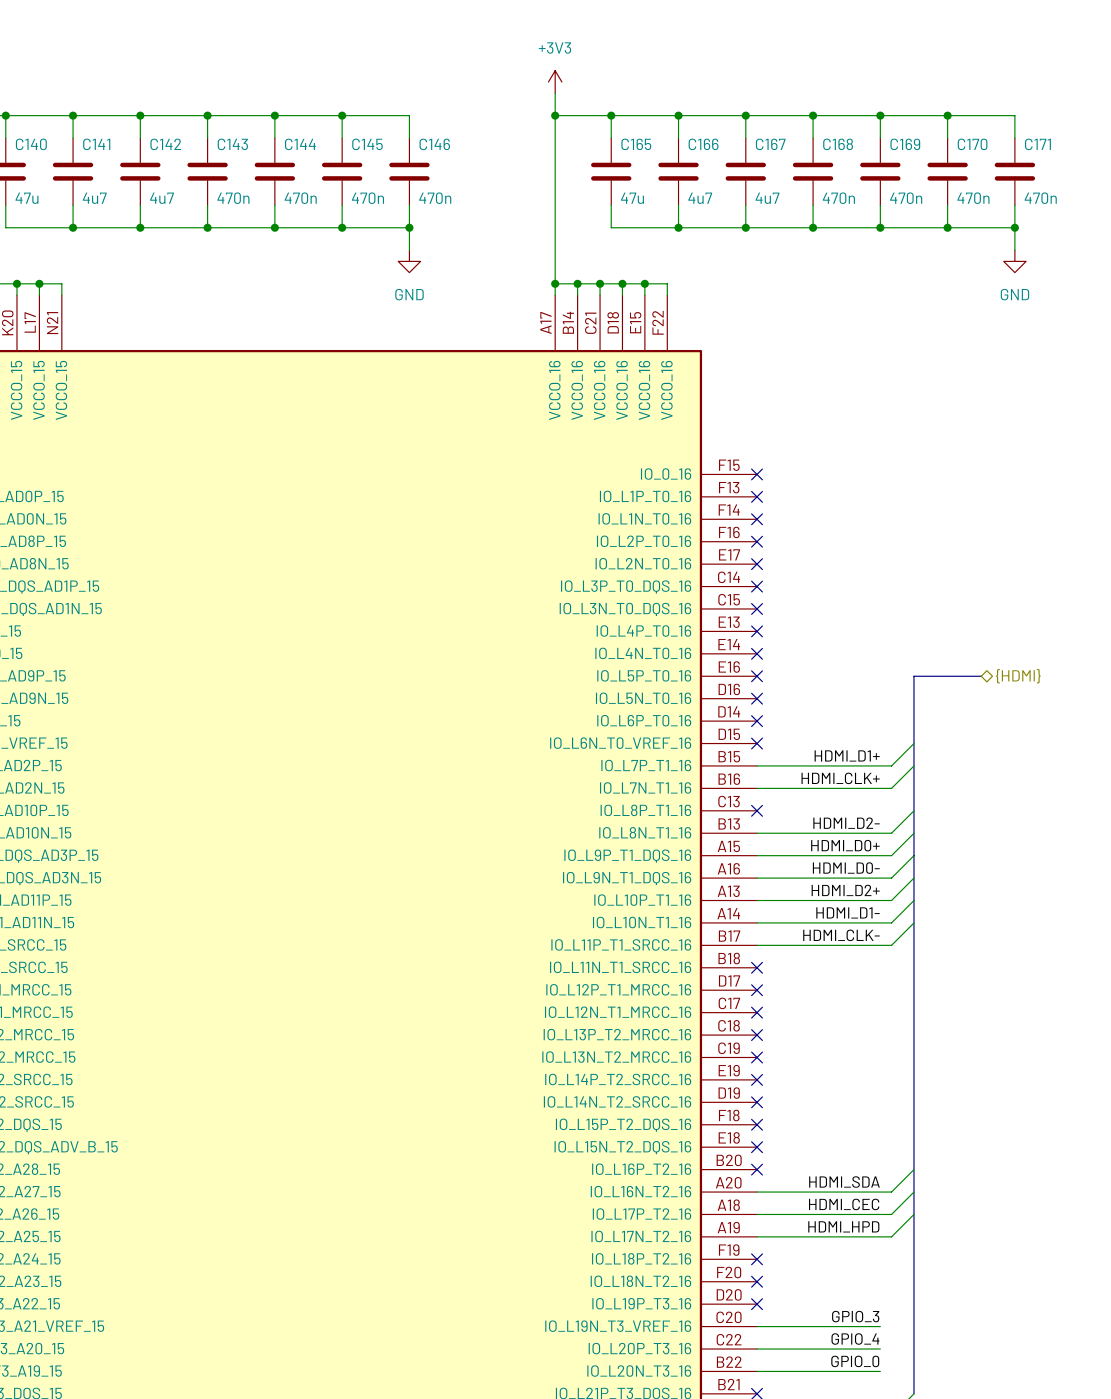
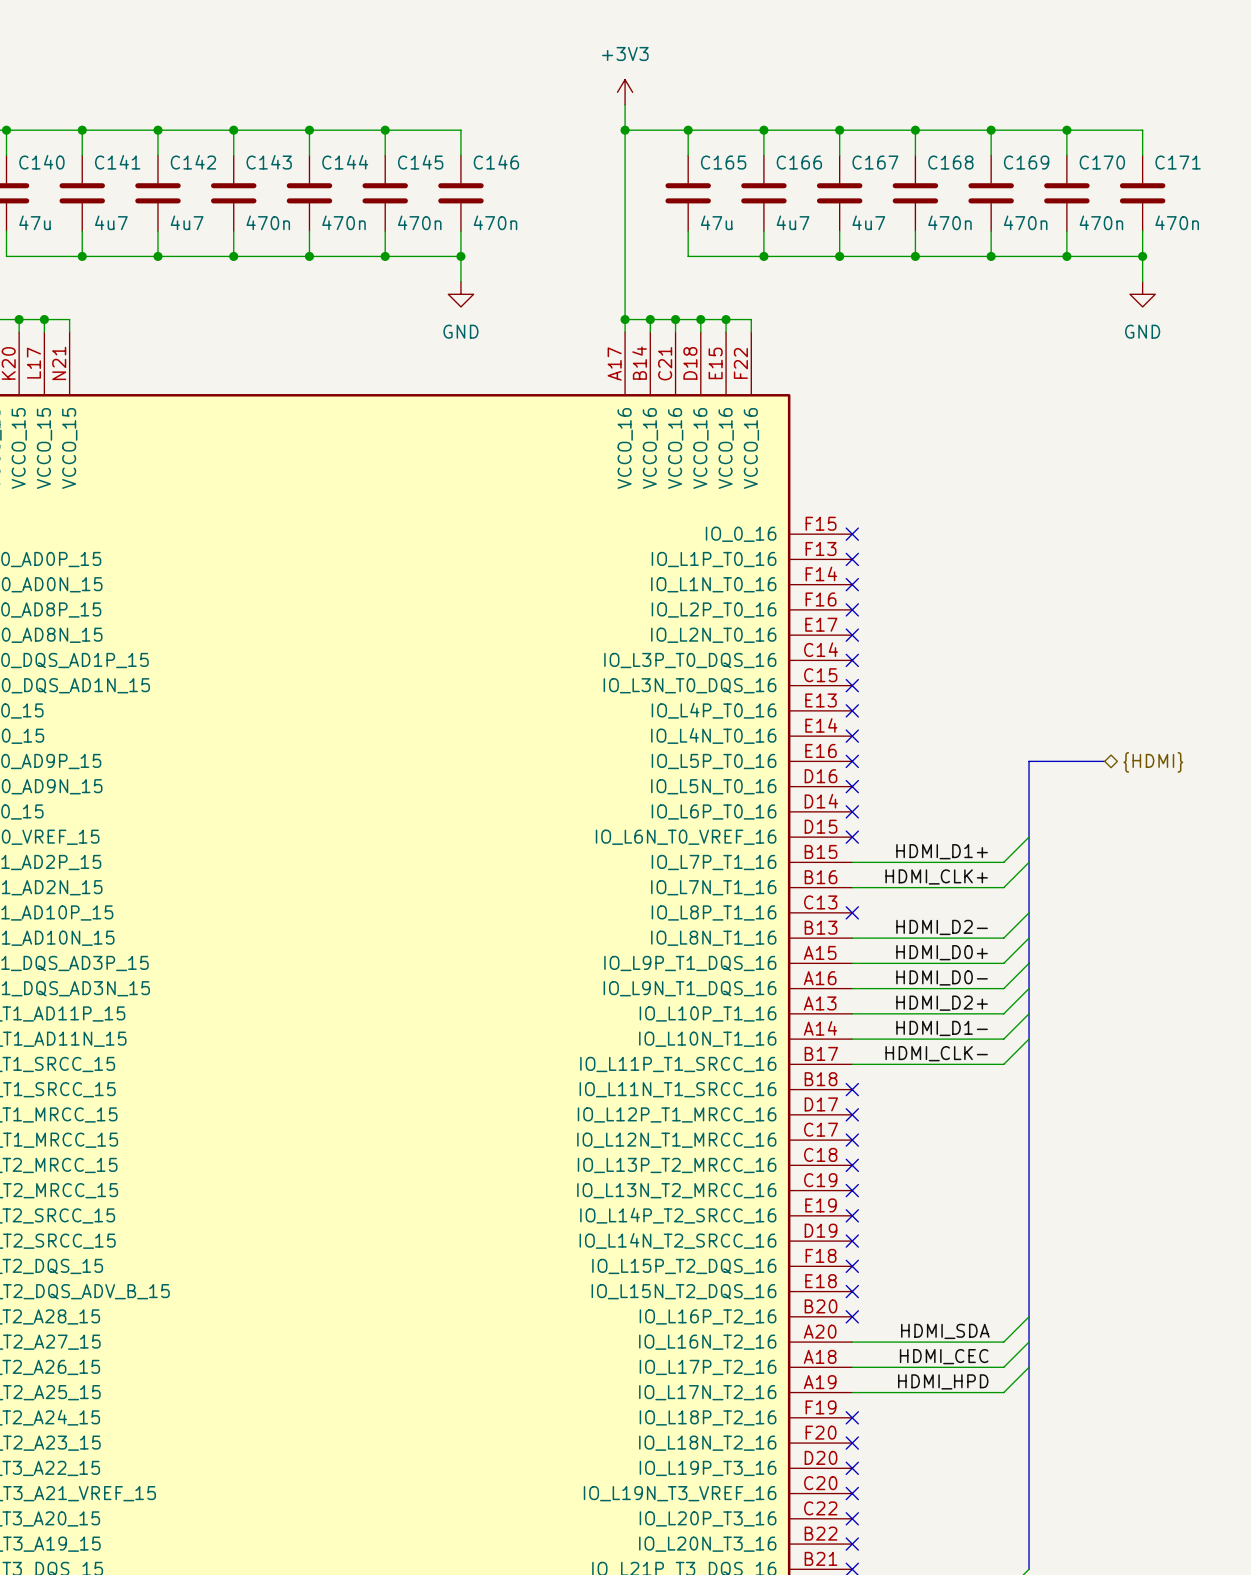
label: GPIO_3 (855, 1316) -> none
wire: (757, 1326) (880, 1326) -> none
no-connect mark: none -> (852, 1493)
label: GPIO_4 (855, 1339) -> none
wire: (757, 1349) (880, 1349) -> none
no-connect mark: none -> (852, 1518)
label: GPIO_0 (855, 1361) -> none
wire: (757, 1371) (880, 1371) -> none
no-connect mark: none -> (852, 1544)

